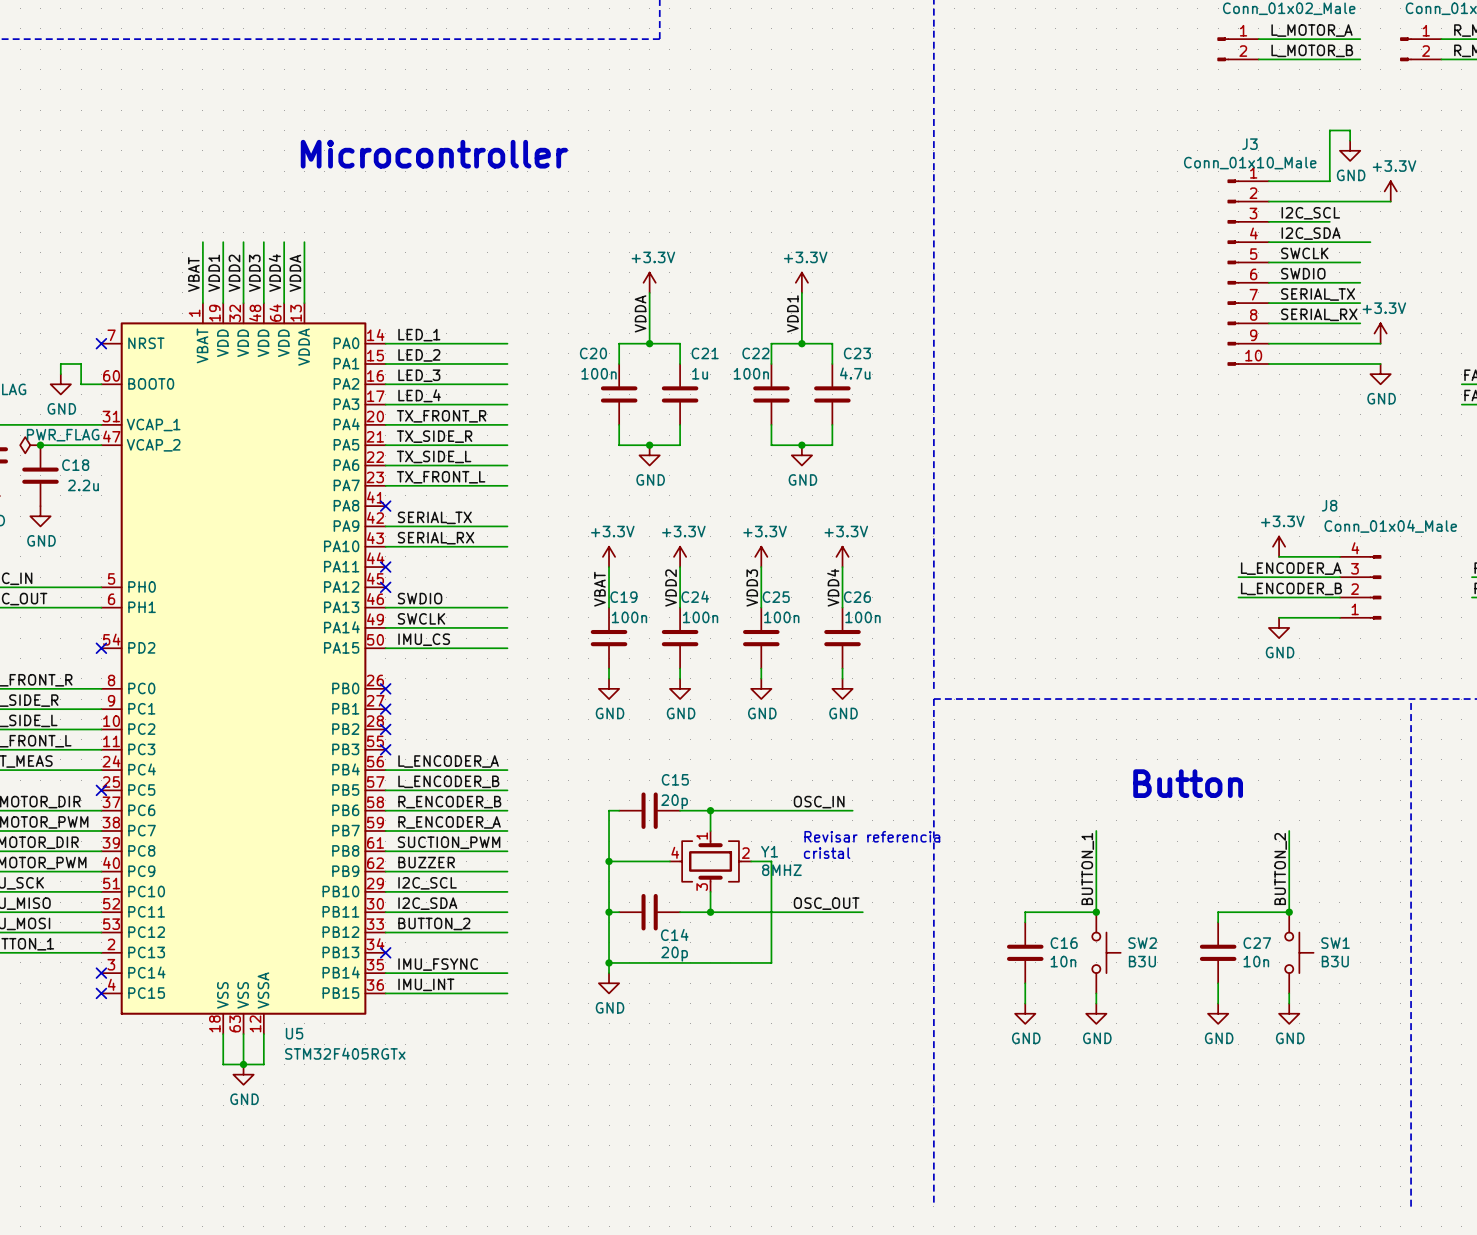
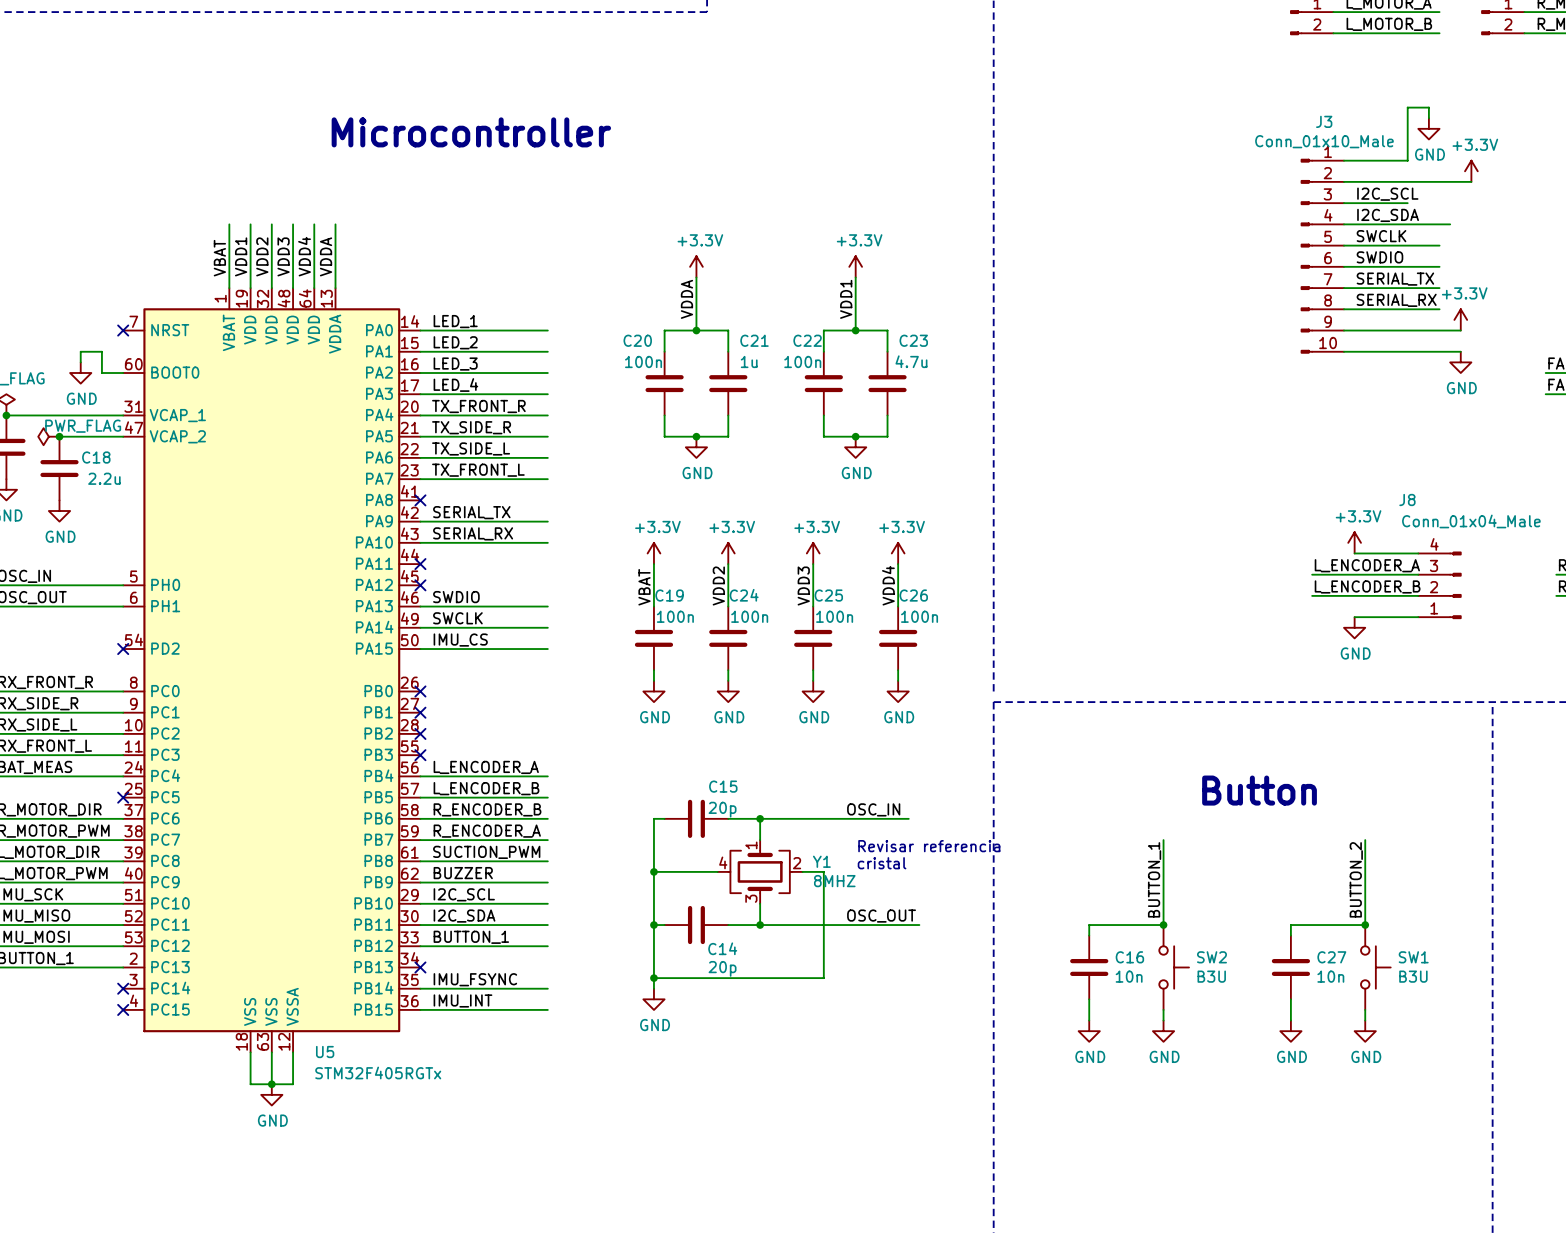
label: BUTTON_2 (434, 923) -> BUTTON_1 (471, 937)

